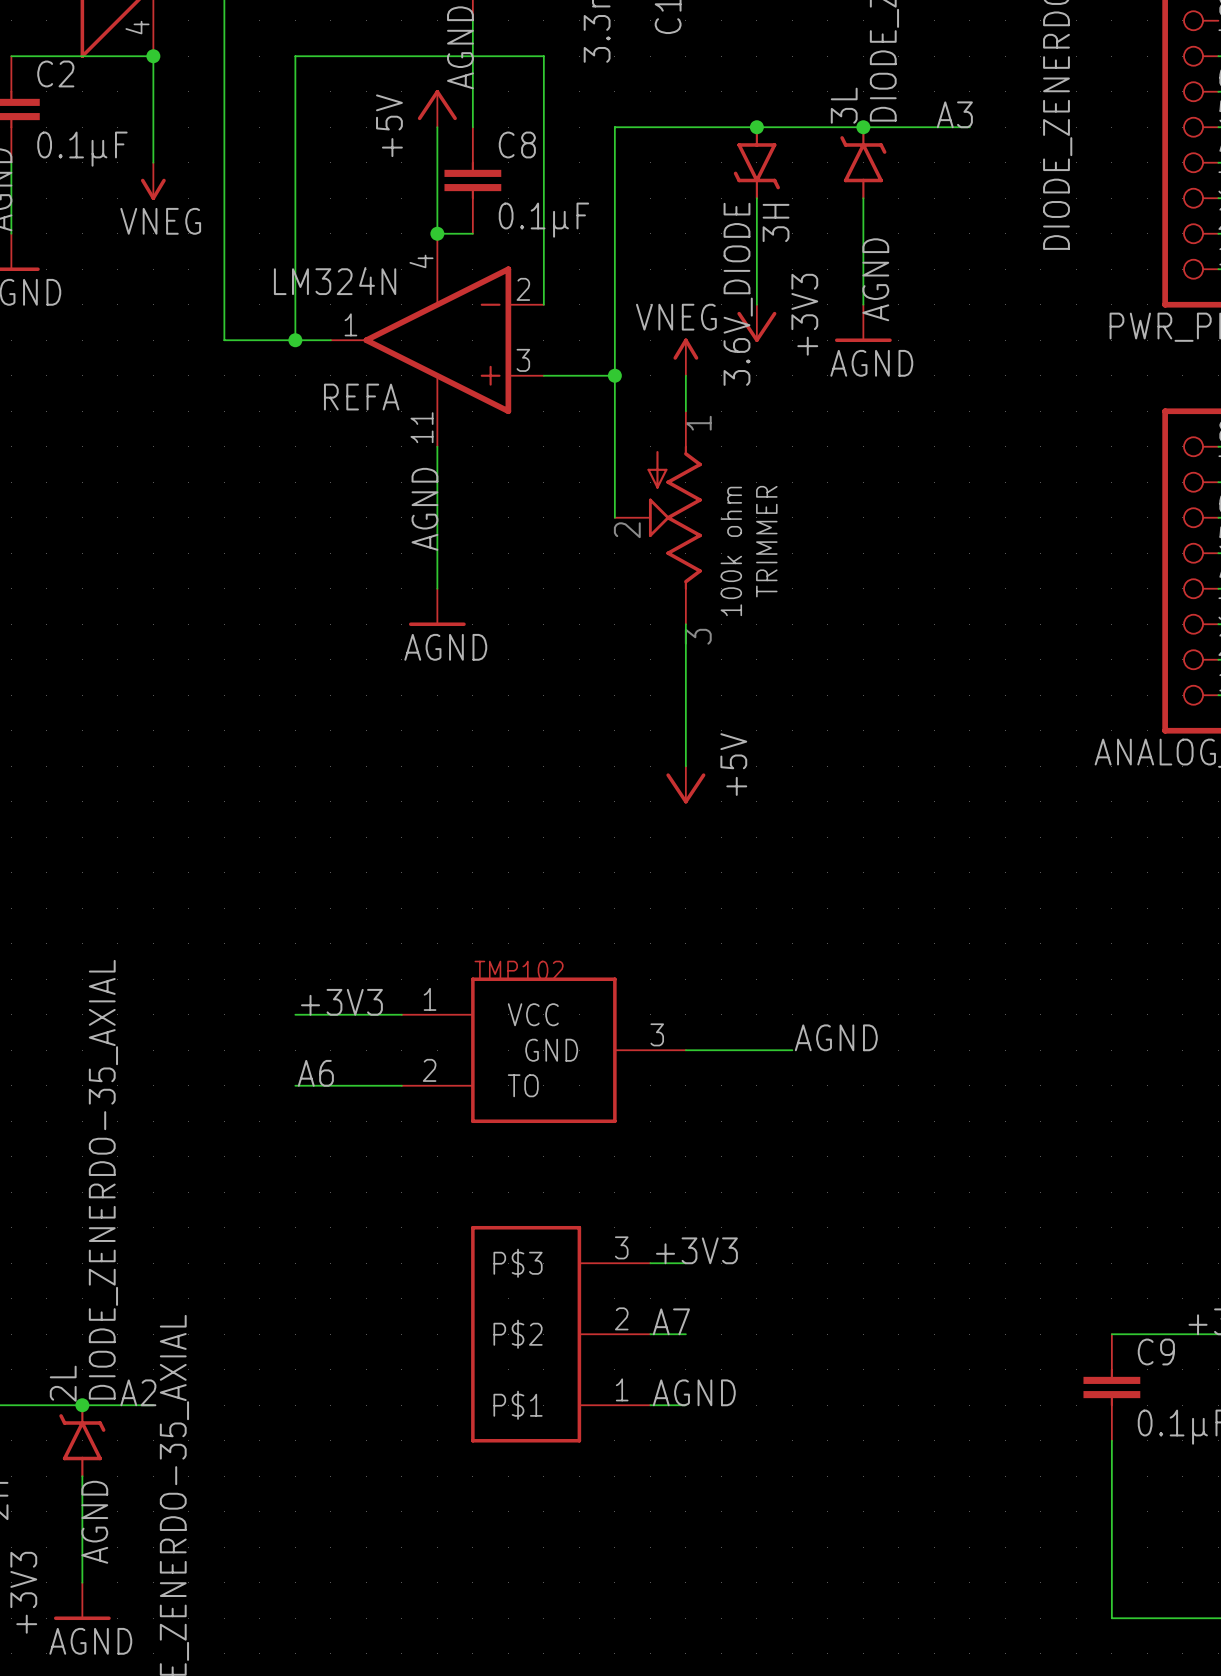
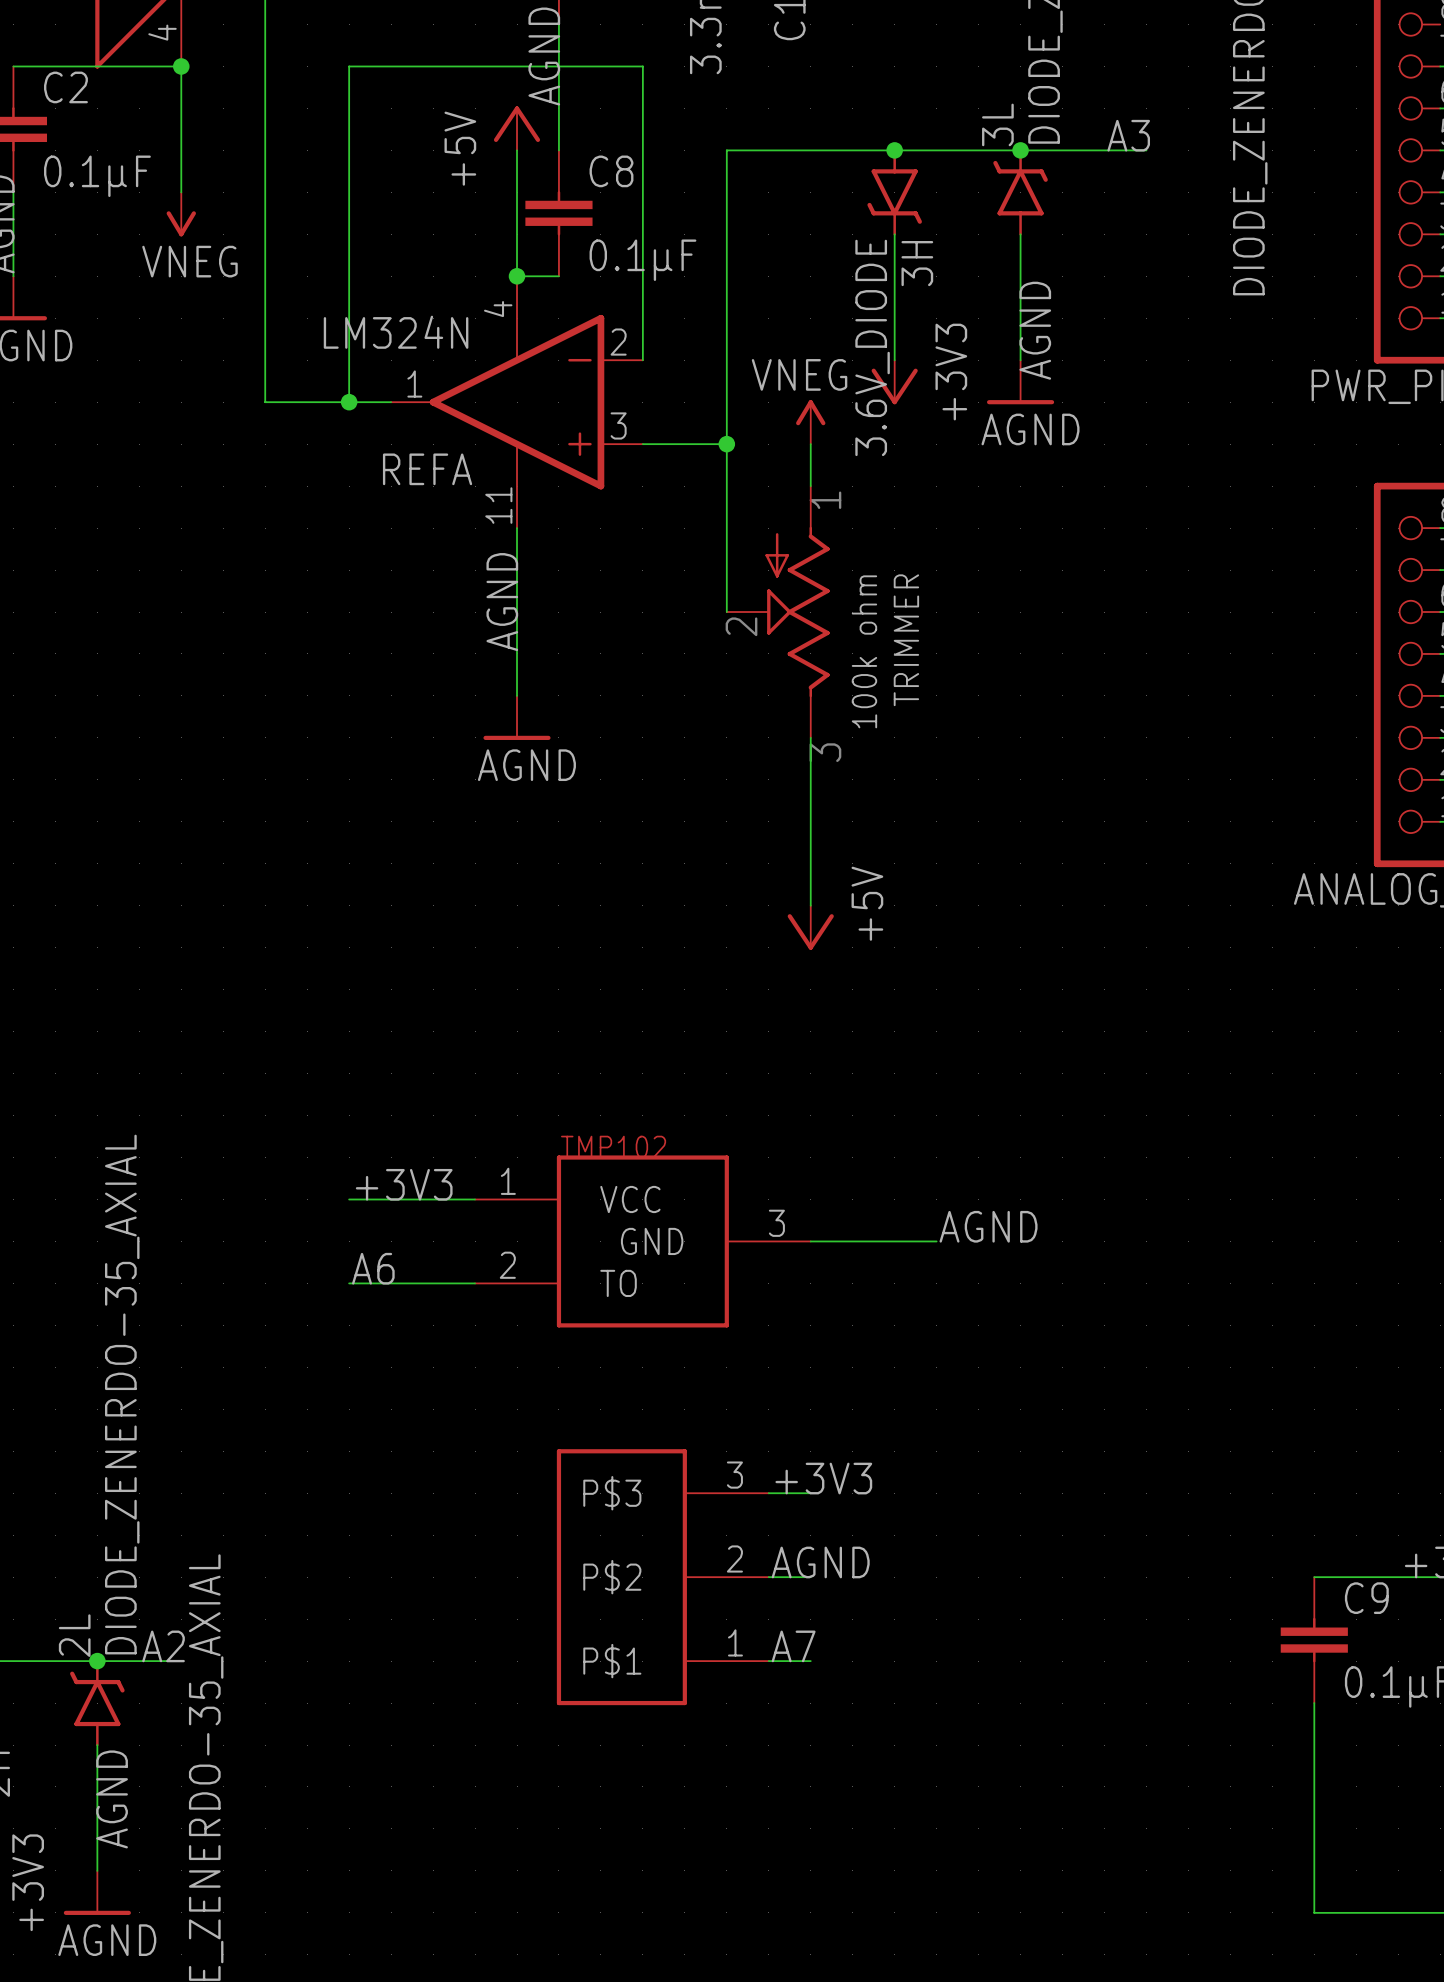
label: A7 (671, 1321) -> AGND (820, 1562)
label: AGND (694, 1392) -> A7 (793, 1646)

